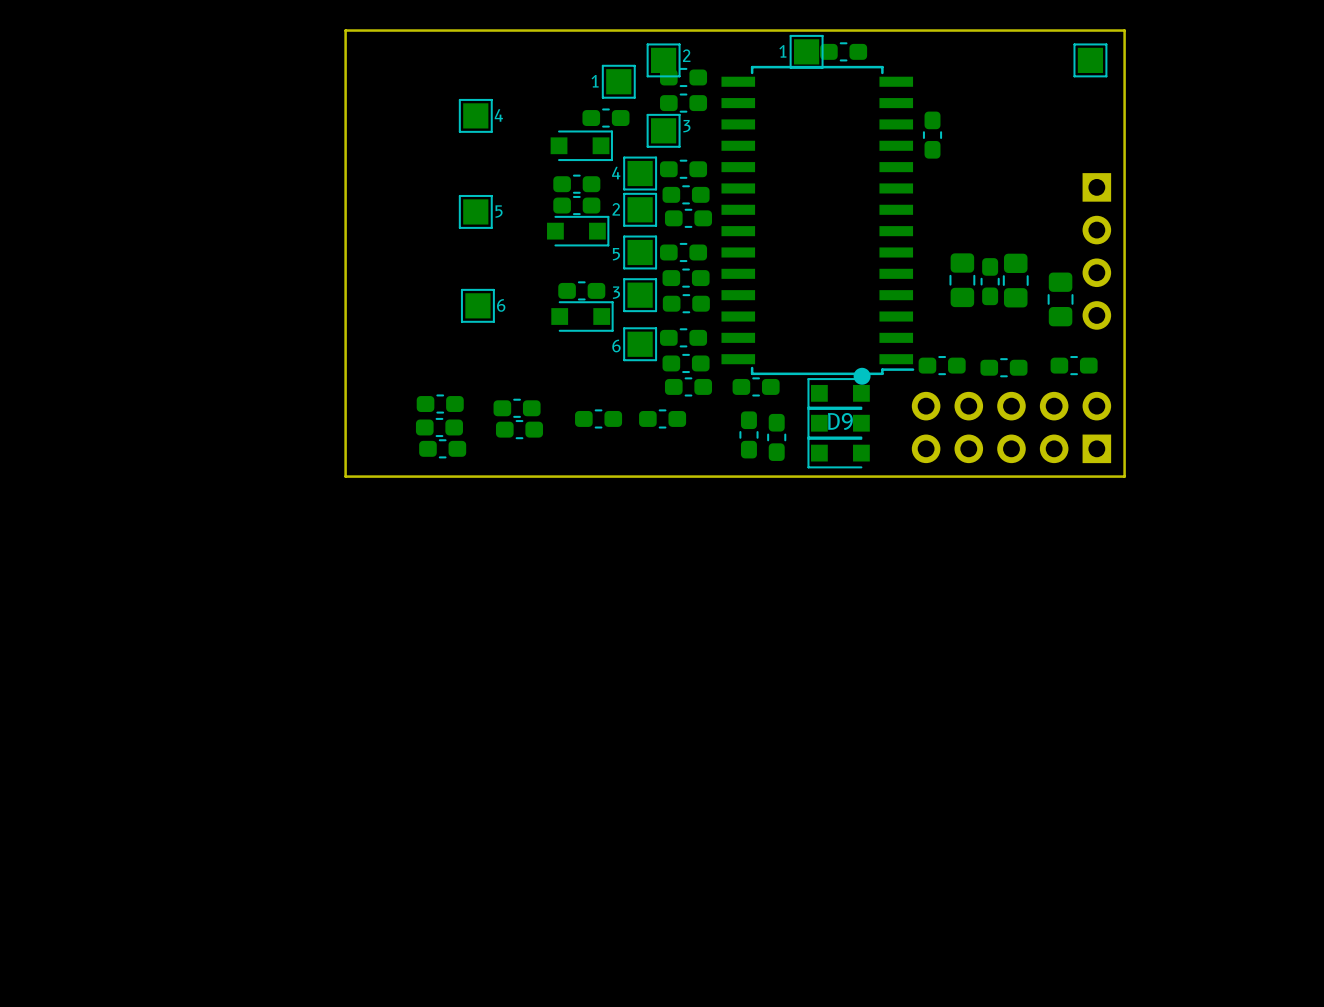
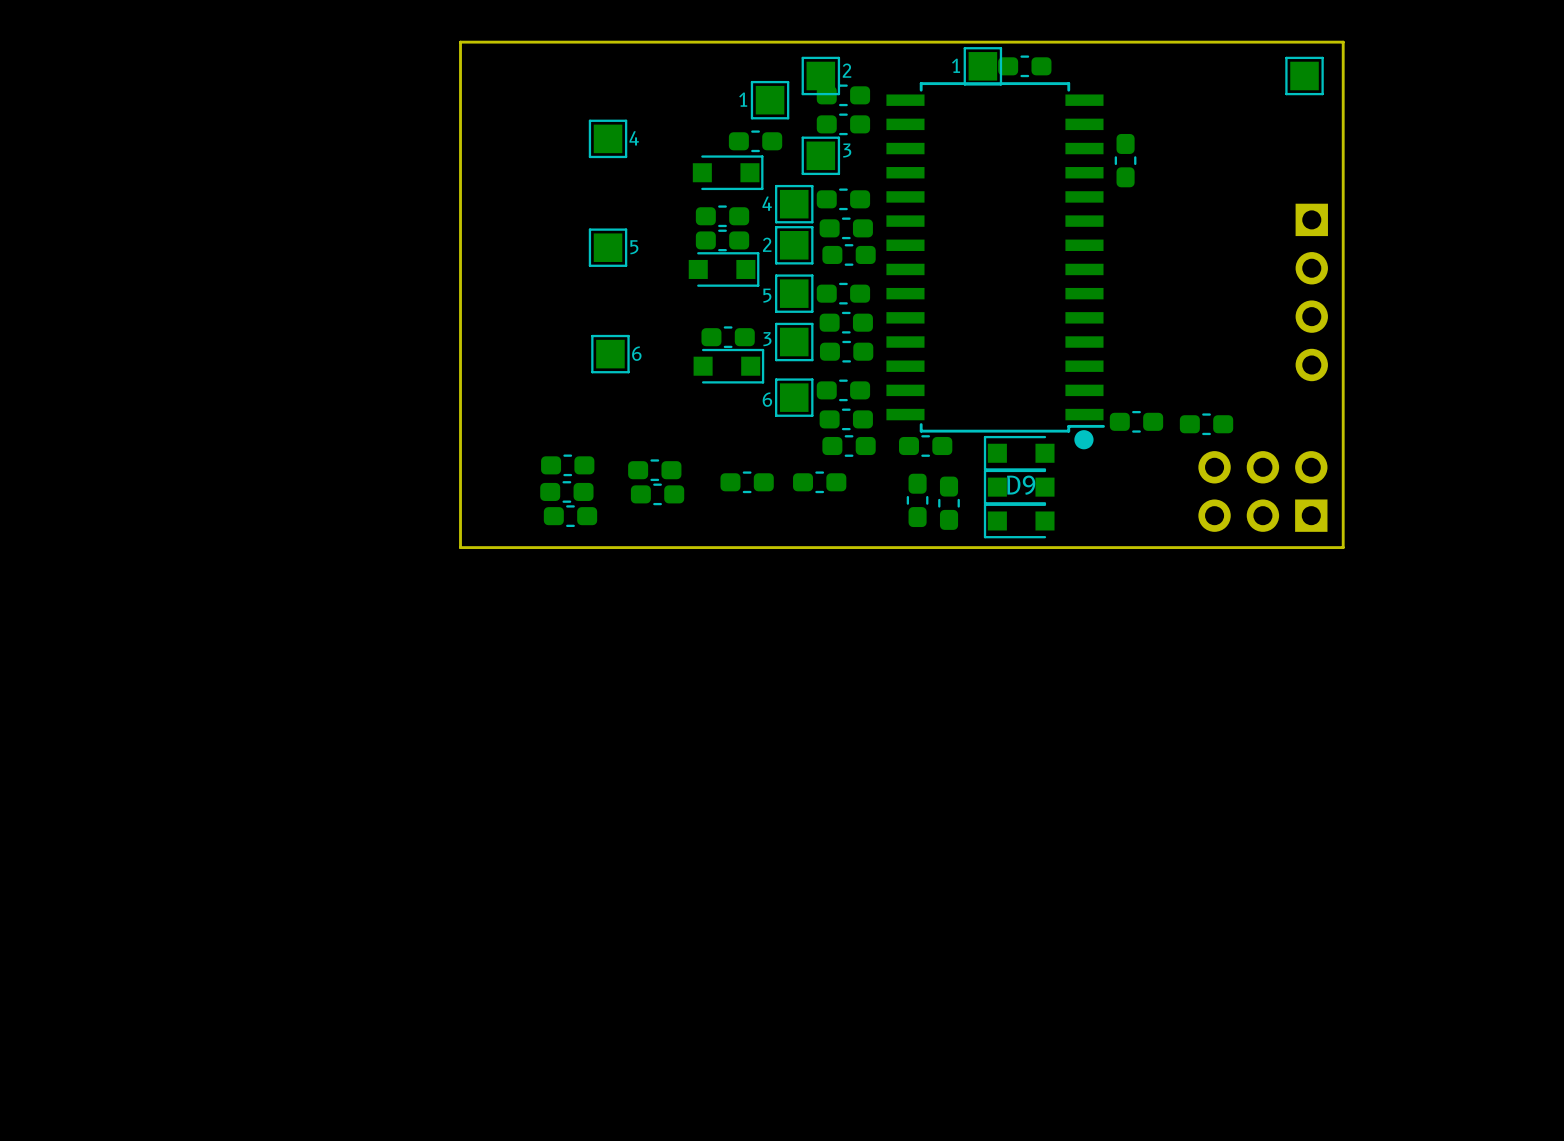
part: (962, 280) -> none
part: (1015, 280) -> none
part: (990, 281) -> none
part: (1060, 299) -> none
part: (1074, 365) -> none
drawing position: (862, 376) -> (1083, 439)
part: (1011, 427) -> none
part: none -> (1262, 491)

